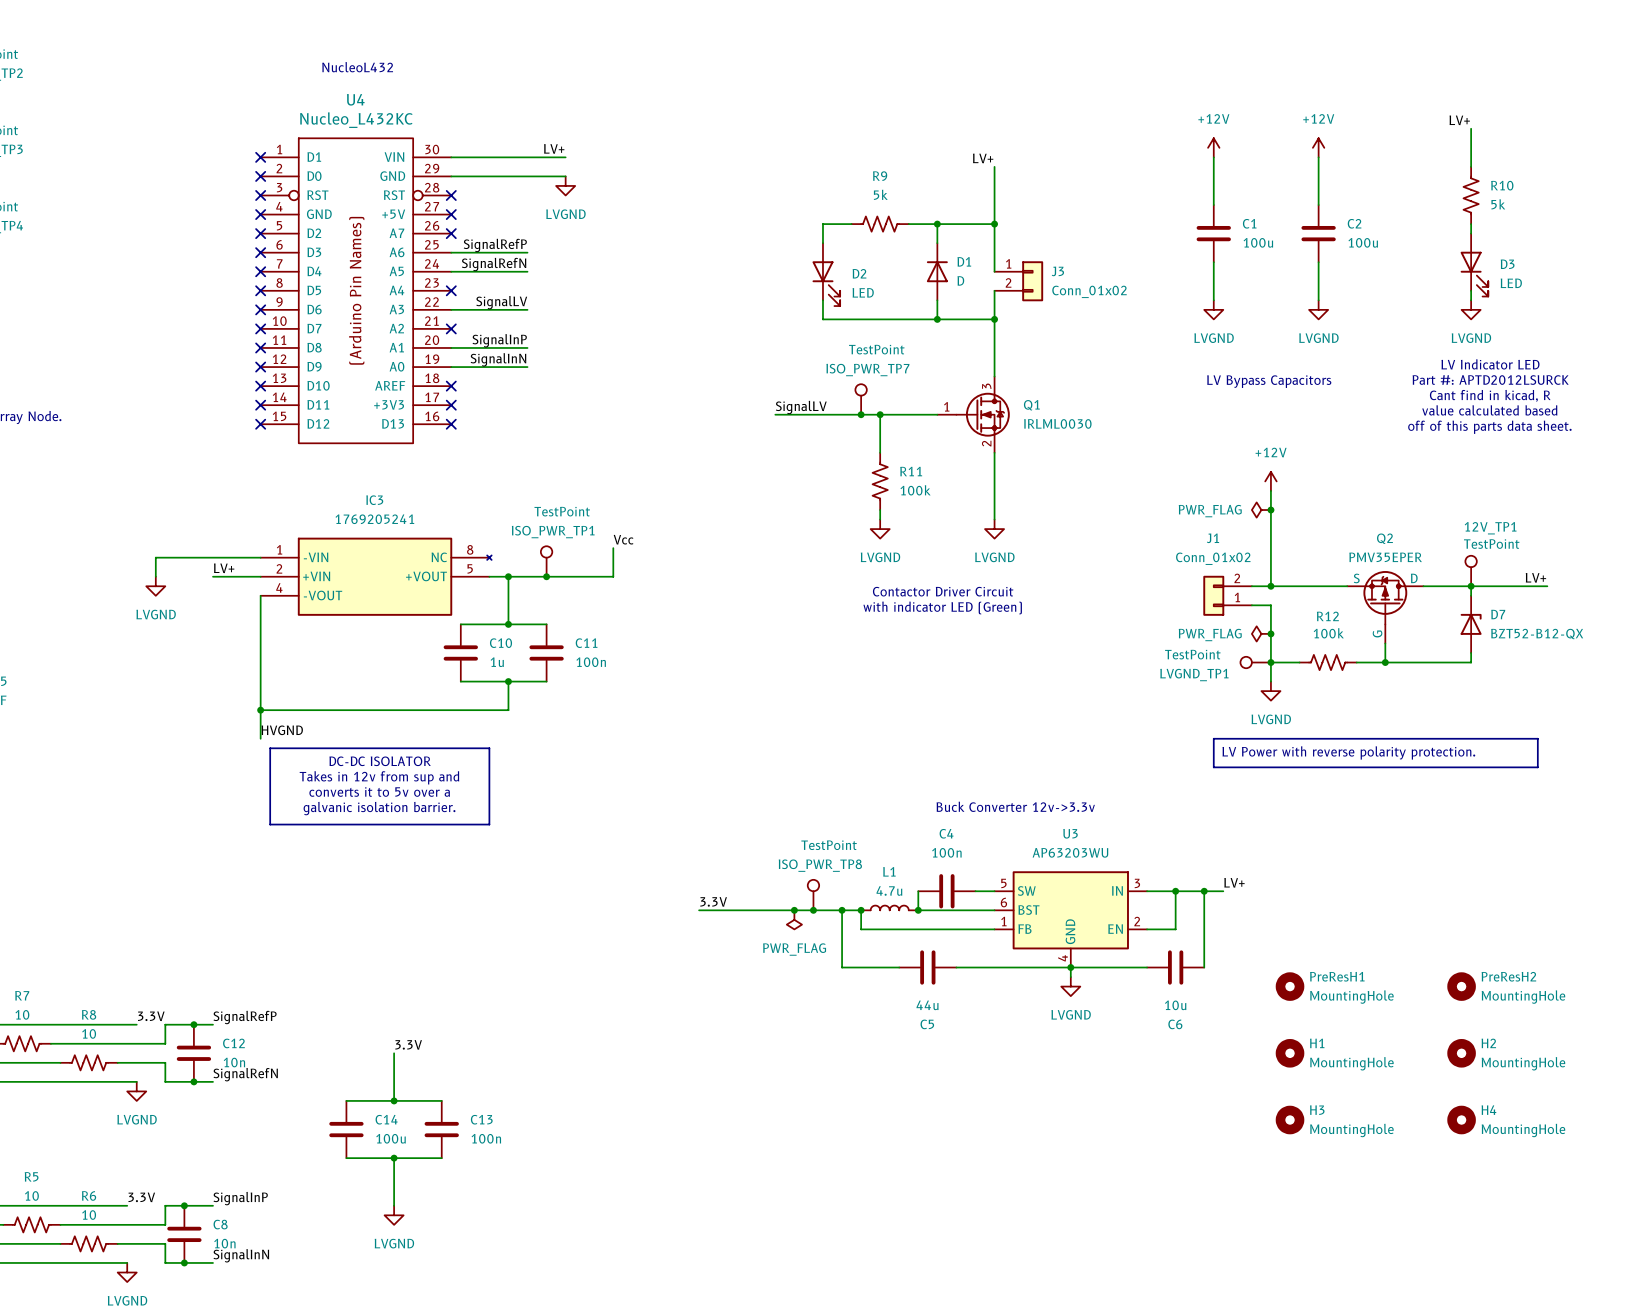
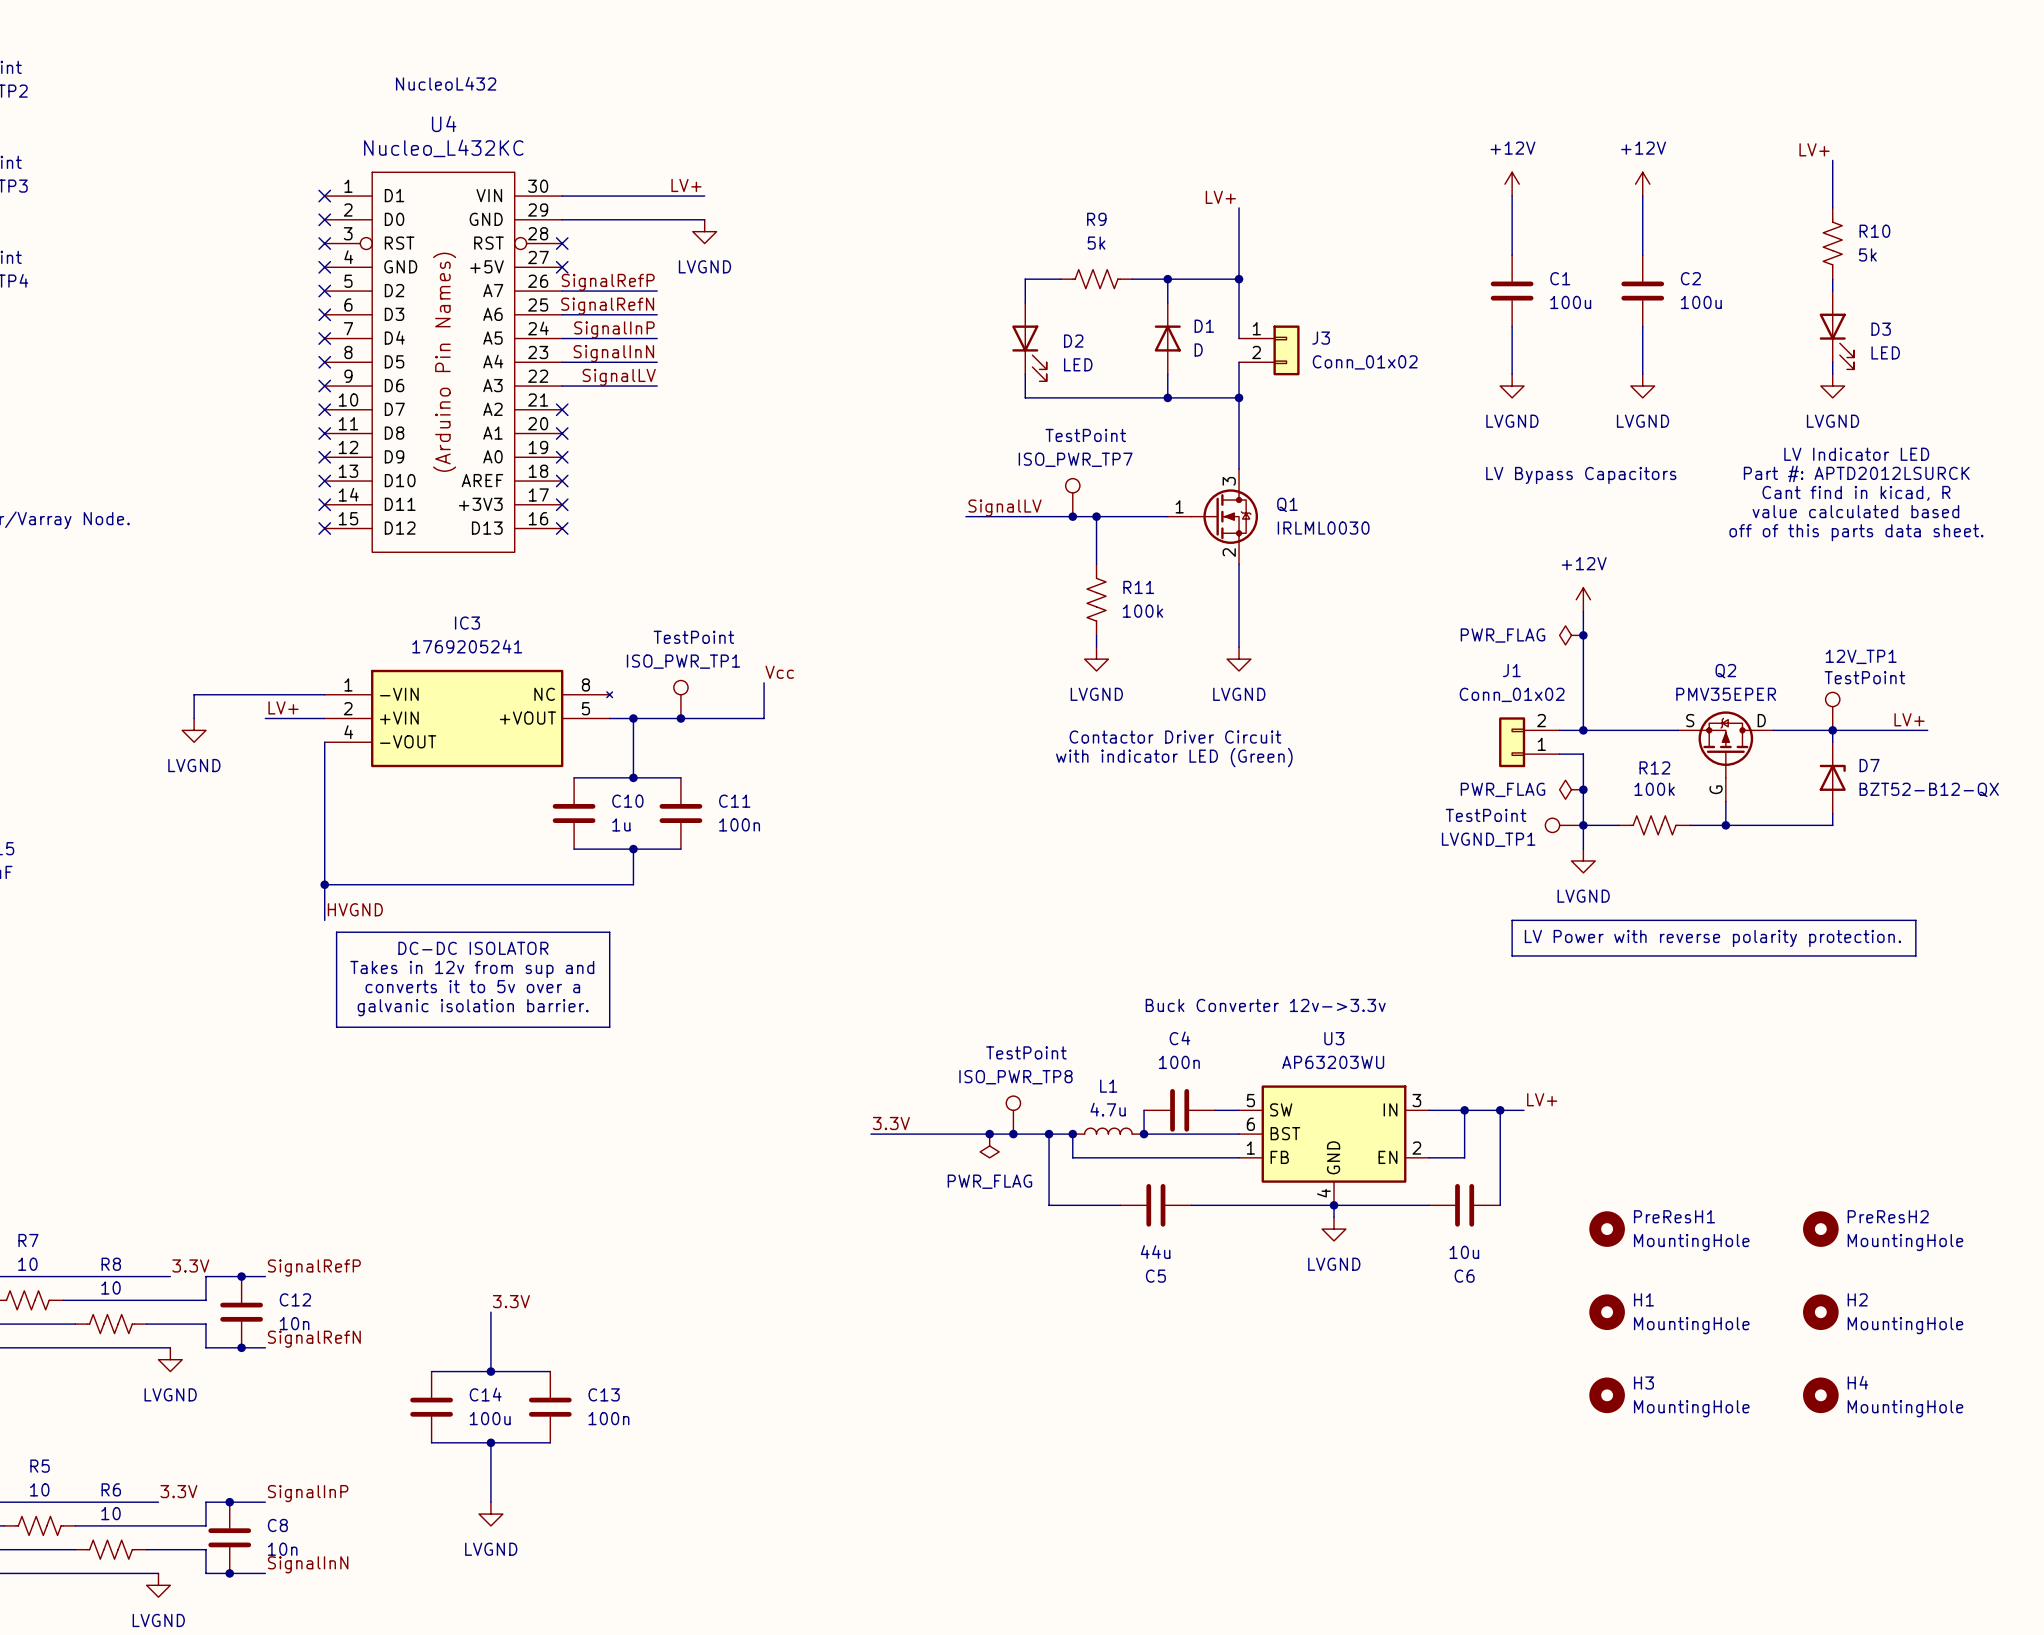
label: none -> SignalRefP (608, 282)
no-connect mark: (451, 233) -> none
label: SignalRefP (495, 245) -> SignalRefN (607, 306)
label: SignalRefN (494, 264) -> SignalInP (614, 329)
no-connect mark: (451, 290) -> none
label: SignalInP (499, 340) -> none
wire: (451, 347) (527, 347) -> (562, 362) (657, 362)
no-connect mark: none -> (562, 433)
label position: SignalInN (498, 359) -> SignalInN (613, 353)
wire: (451, 367) (527, 367) -> (562, 291) (657, 291)
no-connect mark: none -> (562, 457)

